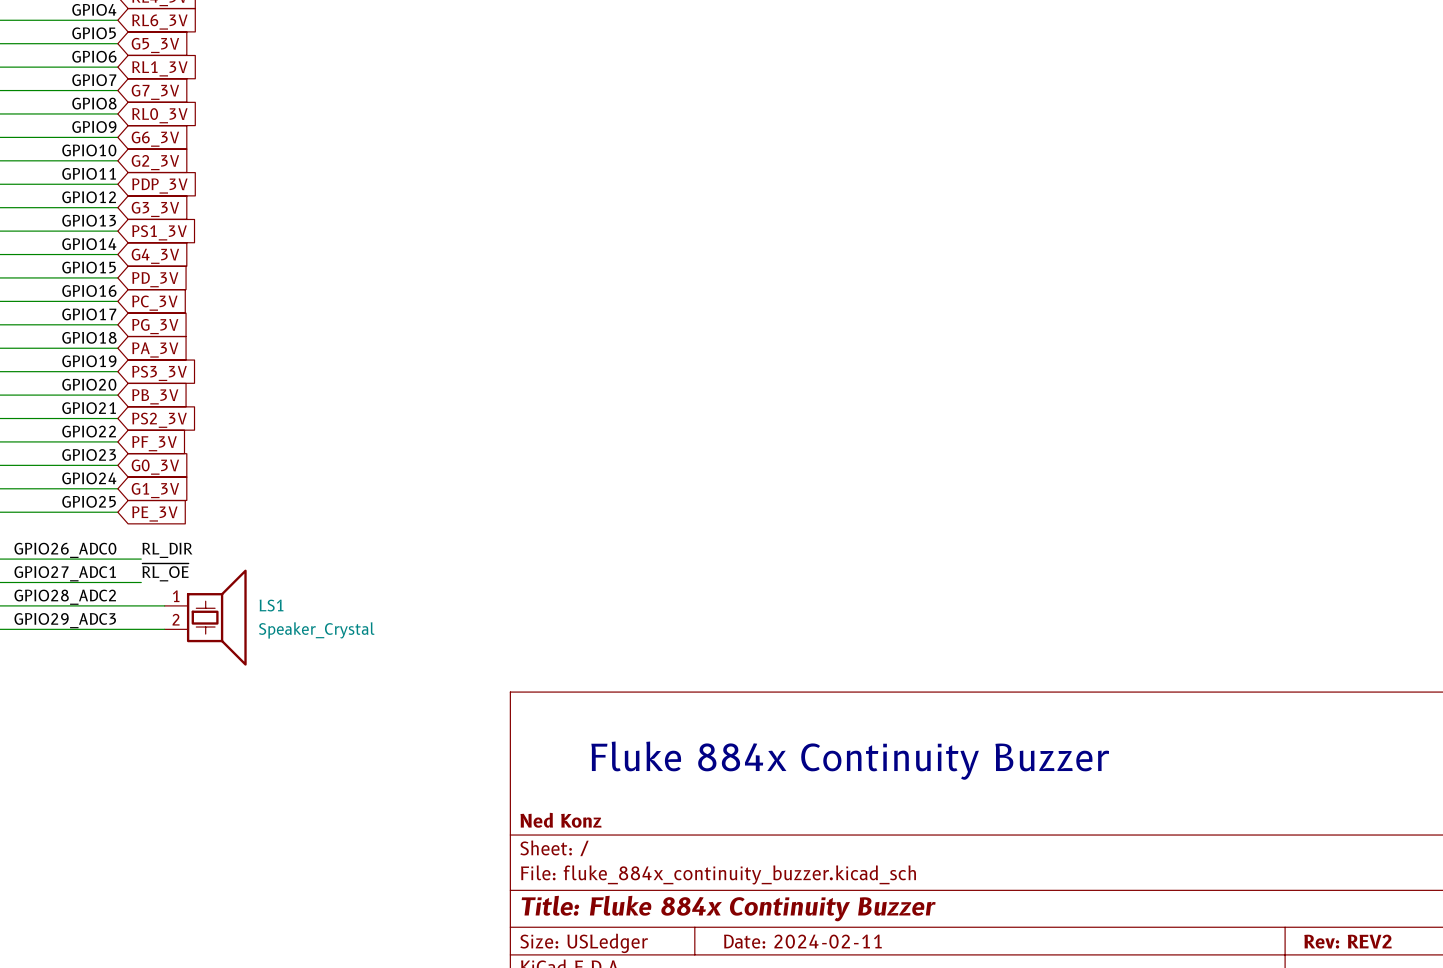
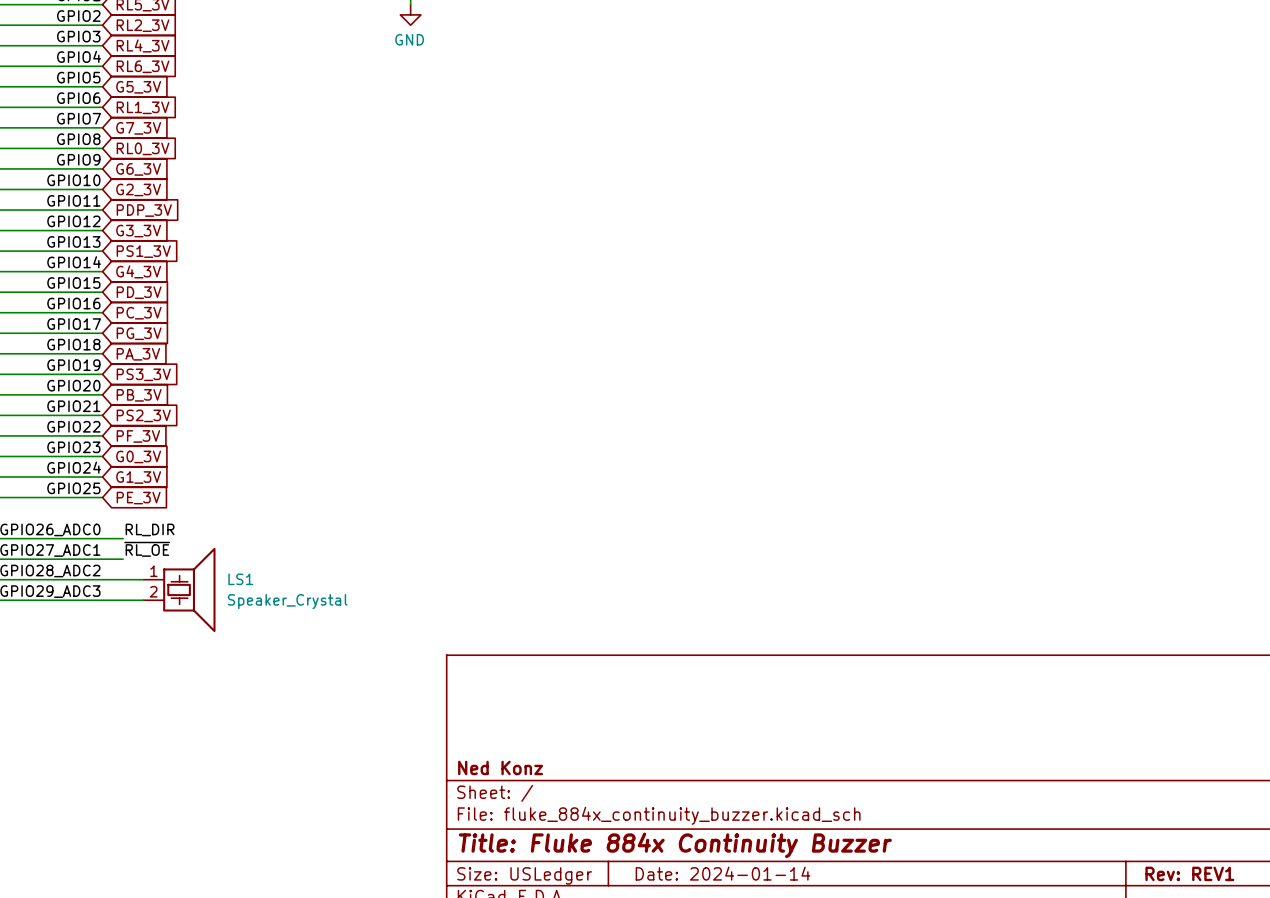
text: Fluke 884x Continuity Buzzer (850, 760) -> none
title block: Date: 2024-02-11 (802, 941) -> Date: 2024-01-14 (723, 873)
title block: Rev: REV2 (1347, 941) -> Rev: REV1 (1189, 873)

